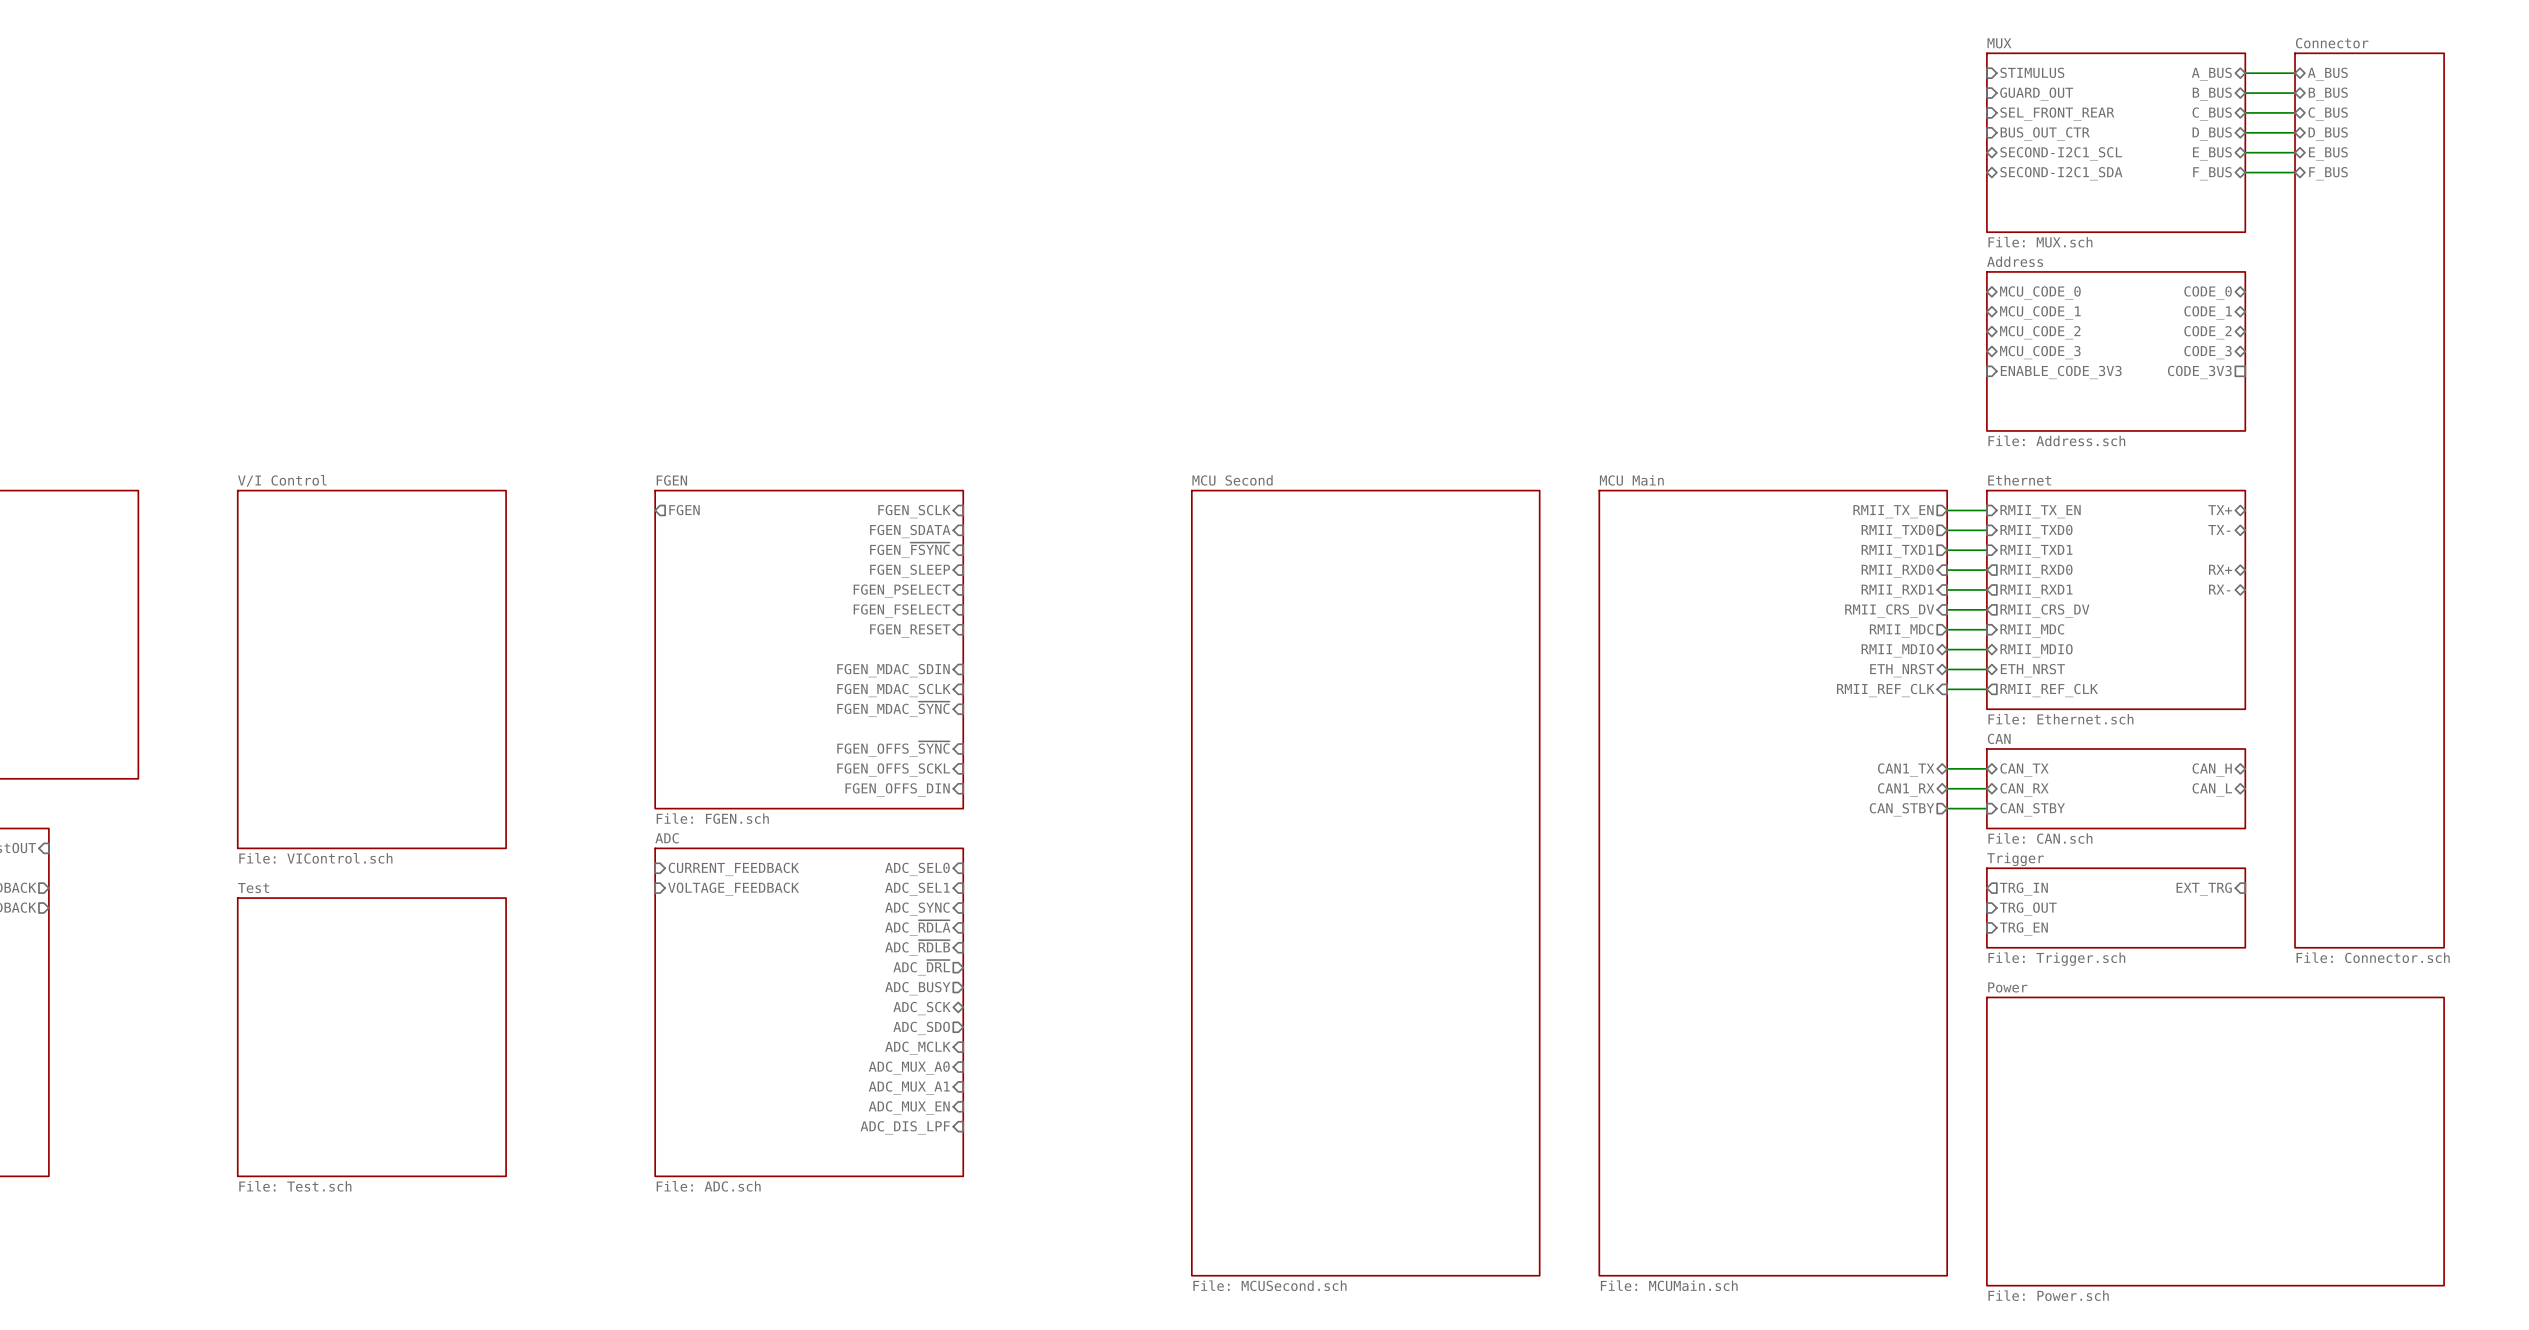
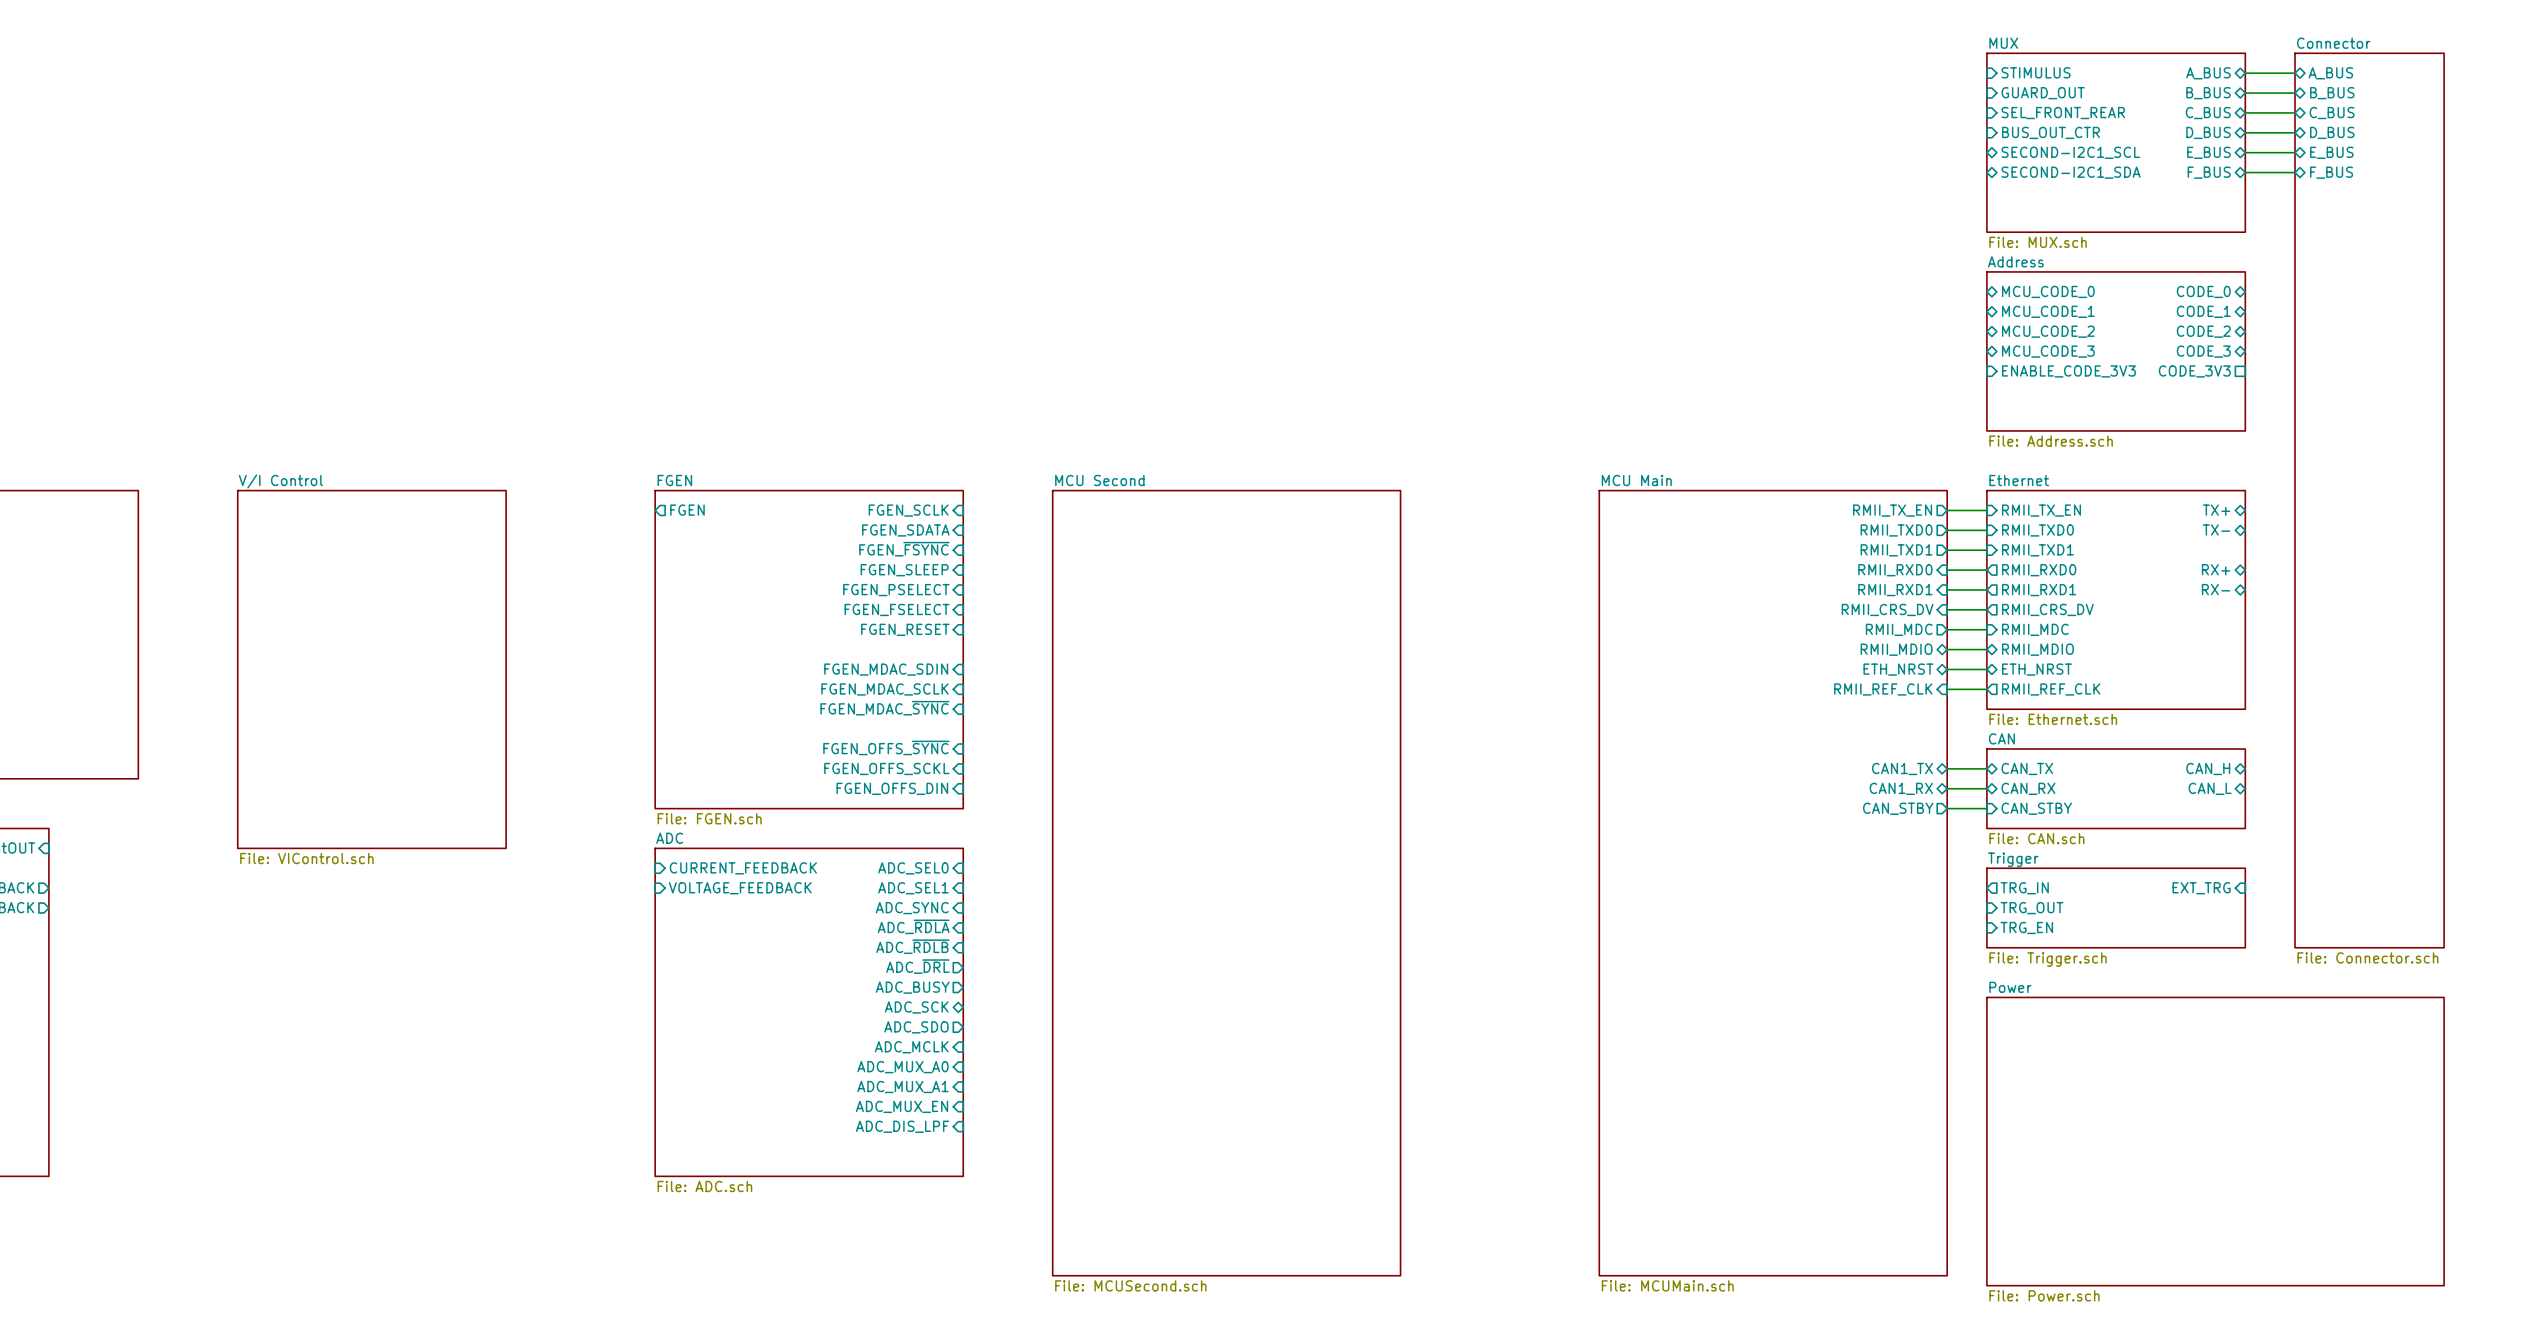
sheet MCU Second position: (1365, 883) -> (1226, 883)
sheet Test: File: Test.sch (371, 1037) -> none

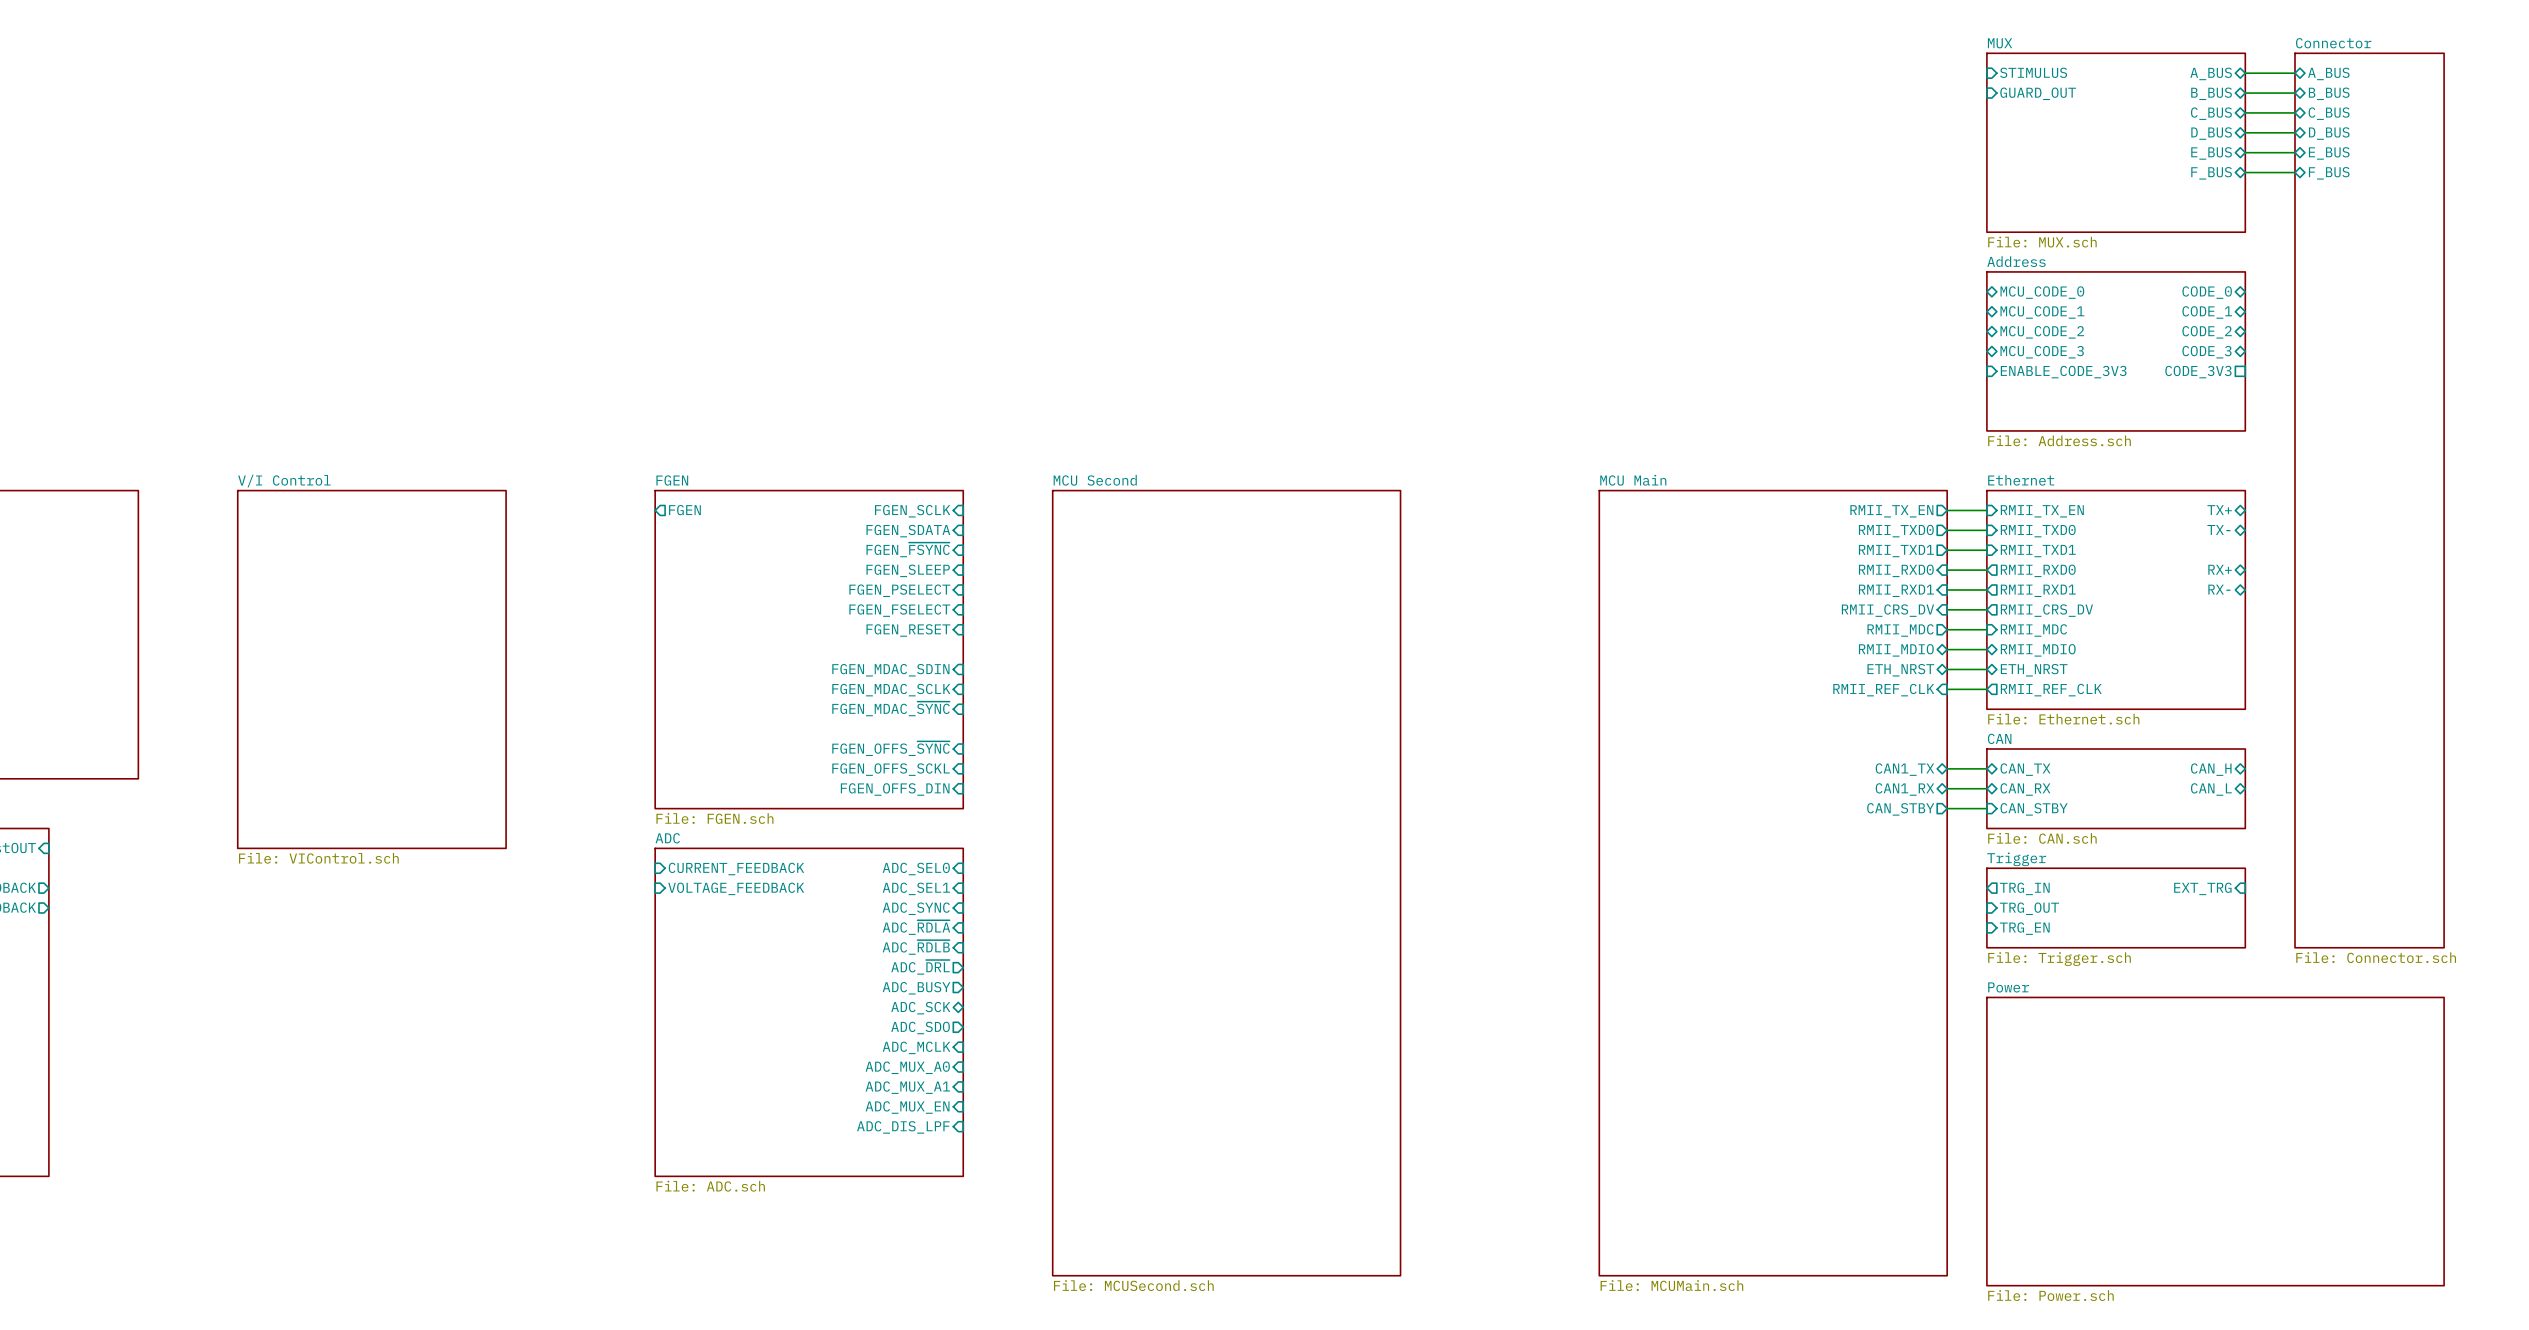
sheet pin: SEL_FRONT_REAR (2063, 113) -> none
sheet pin: BUS_OUT_CTR (2050, 132) -> none
sheet pin: SECOND-I2C1_SCL (2070, 152) -> none
sheet pin: SECOND-I2C1_SDA (2071, 172) -> none

